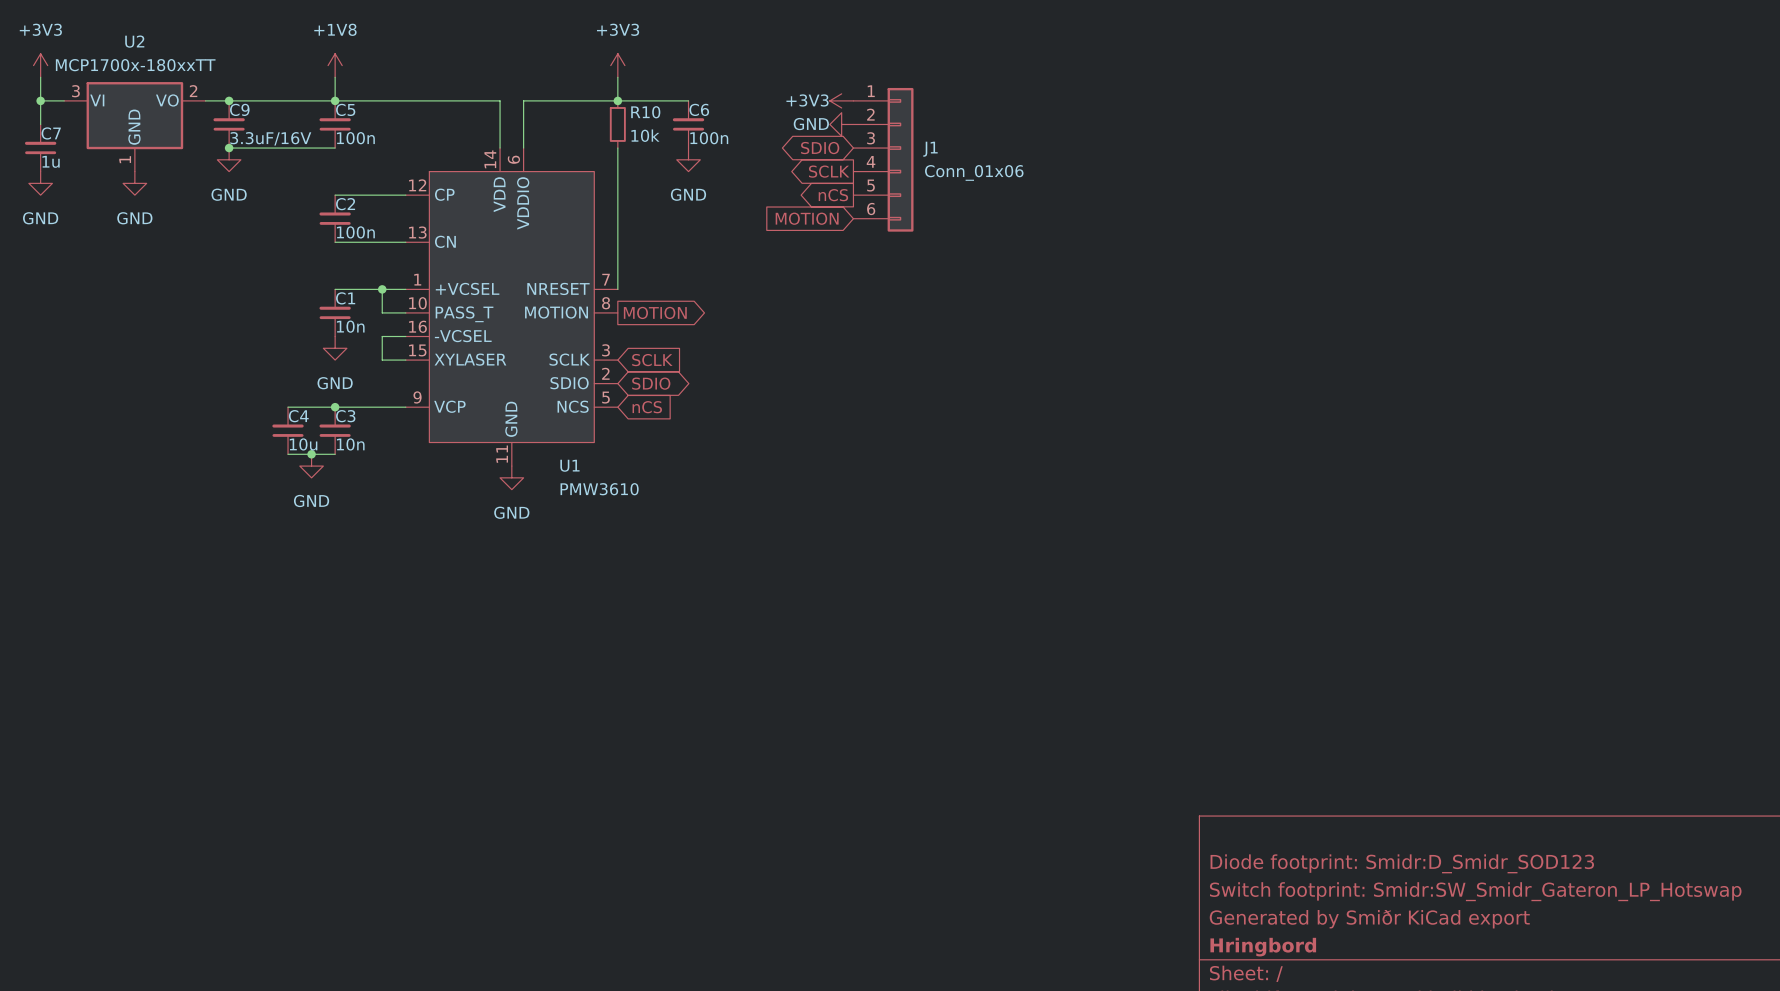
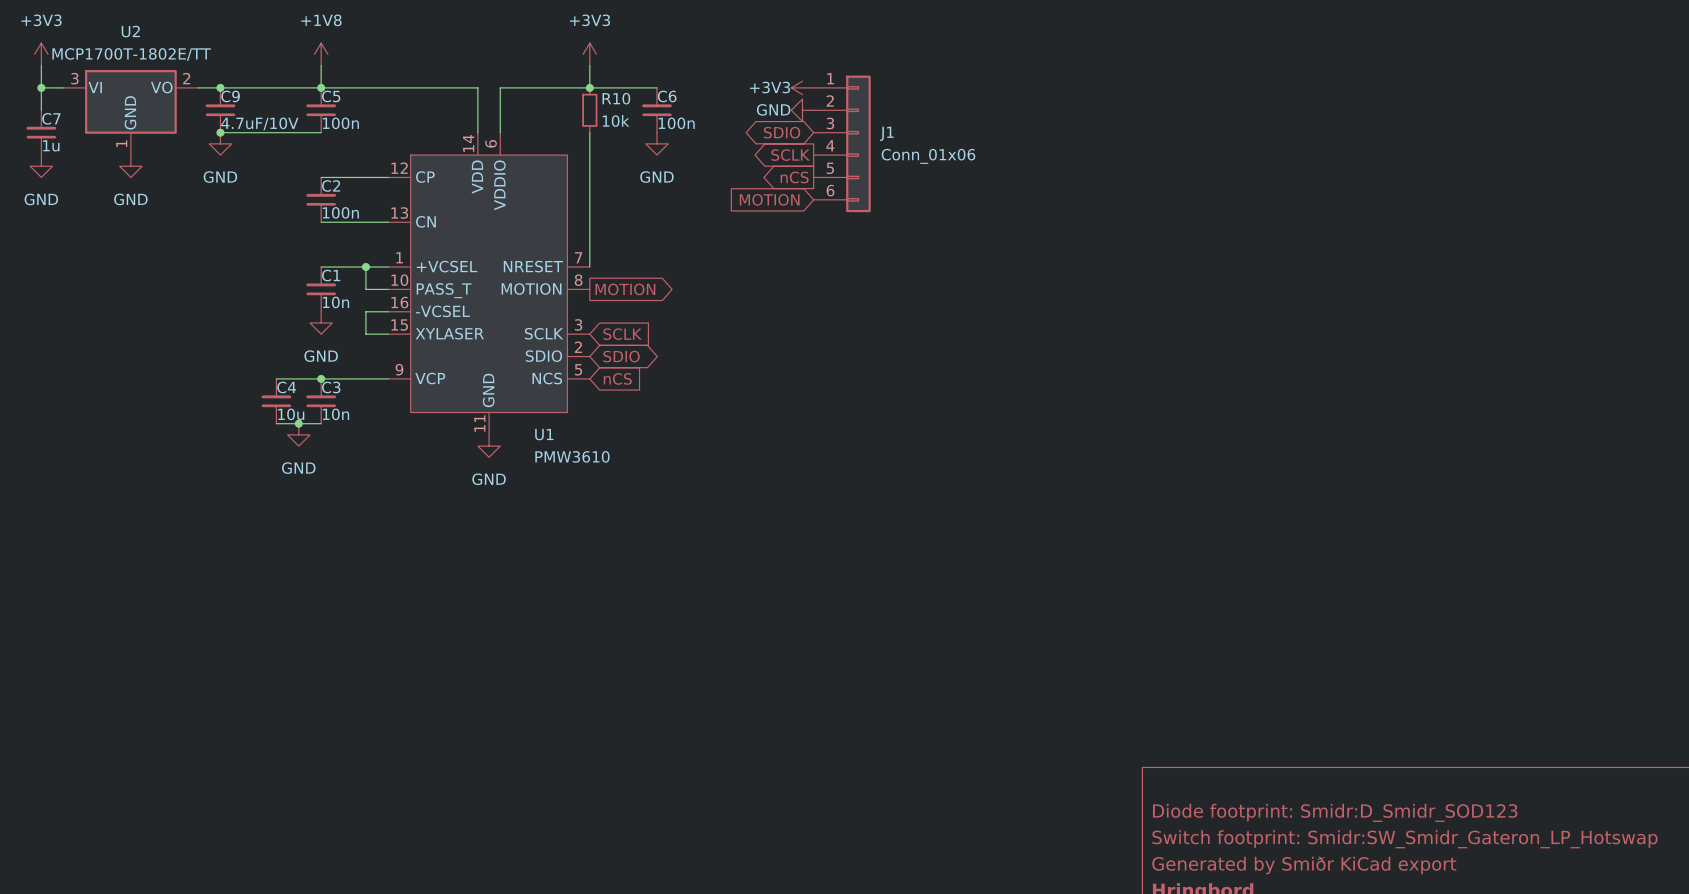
U2 value: MCP1700x-180xxTT (135, 65) -> MCP1700T-1802E/TT (131, 54)
C9 value: 3.3uF/16V (270, 138) -> 4.7uF/10V (259, 123)

